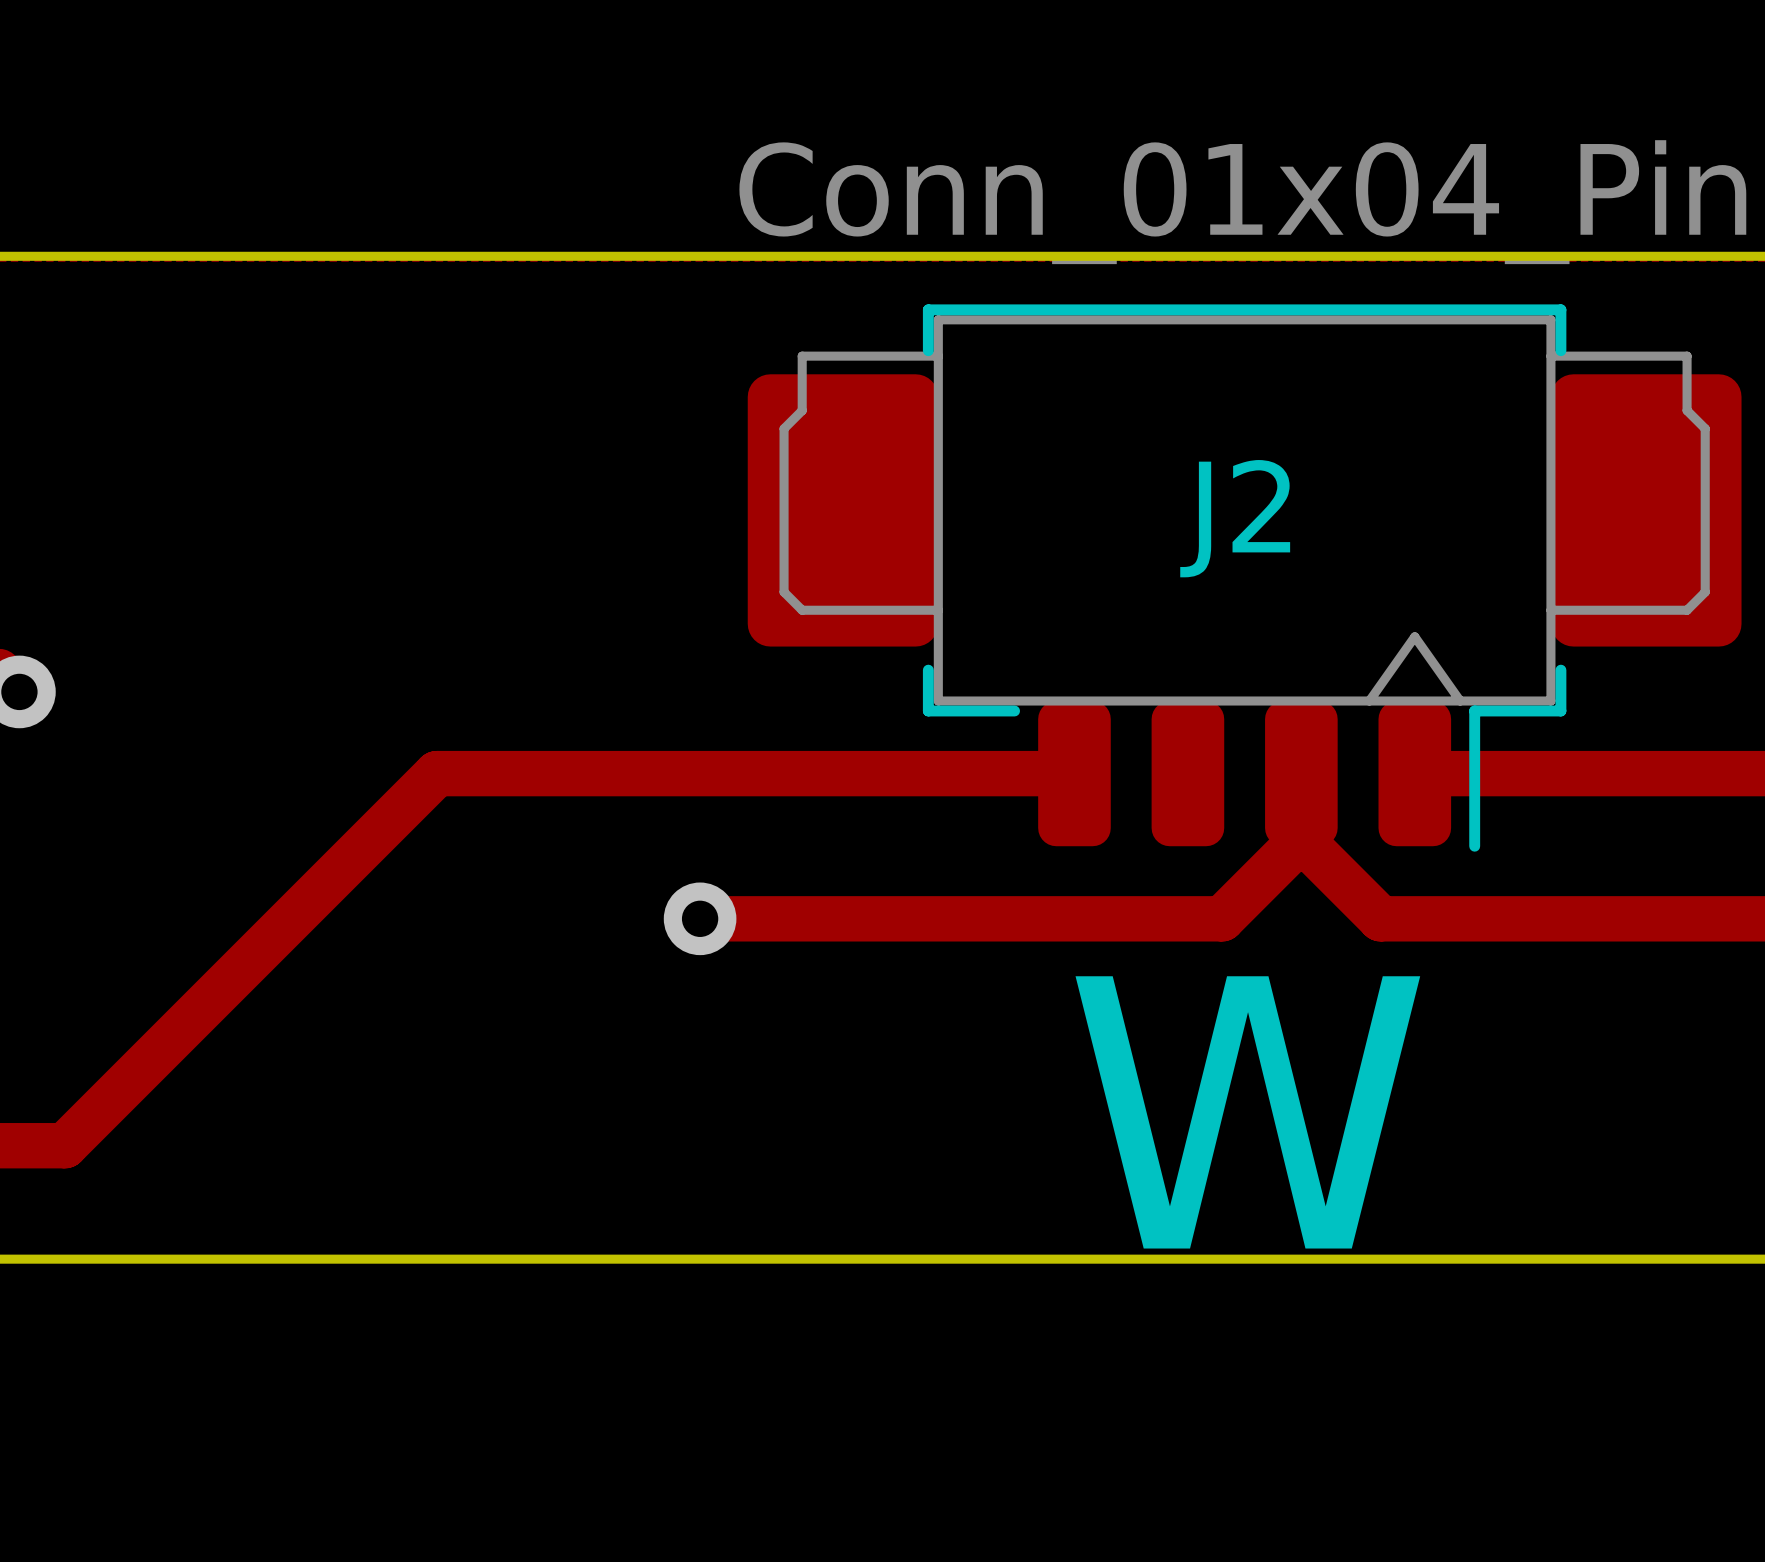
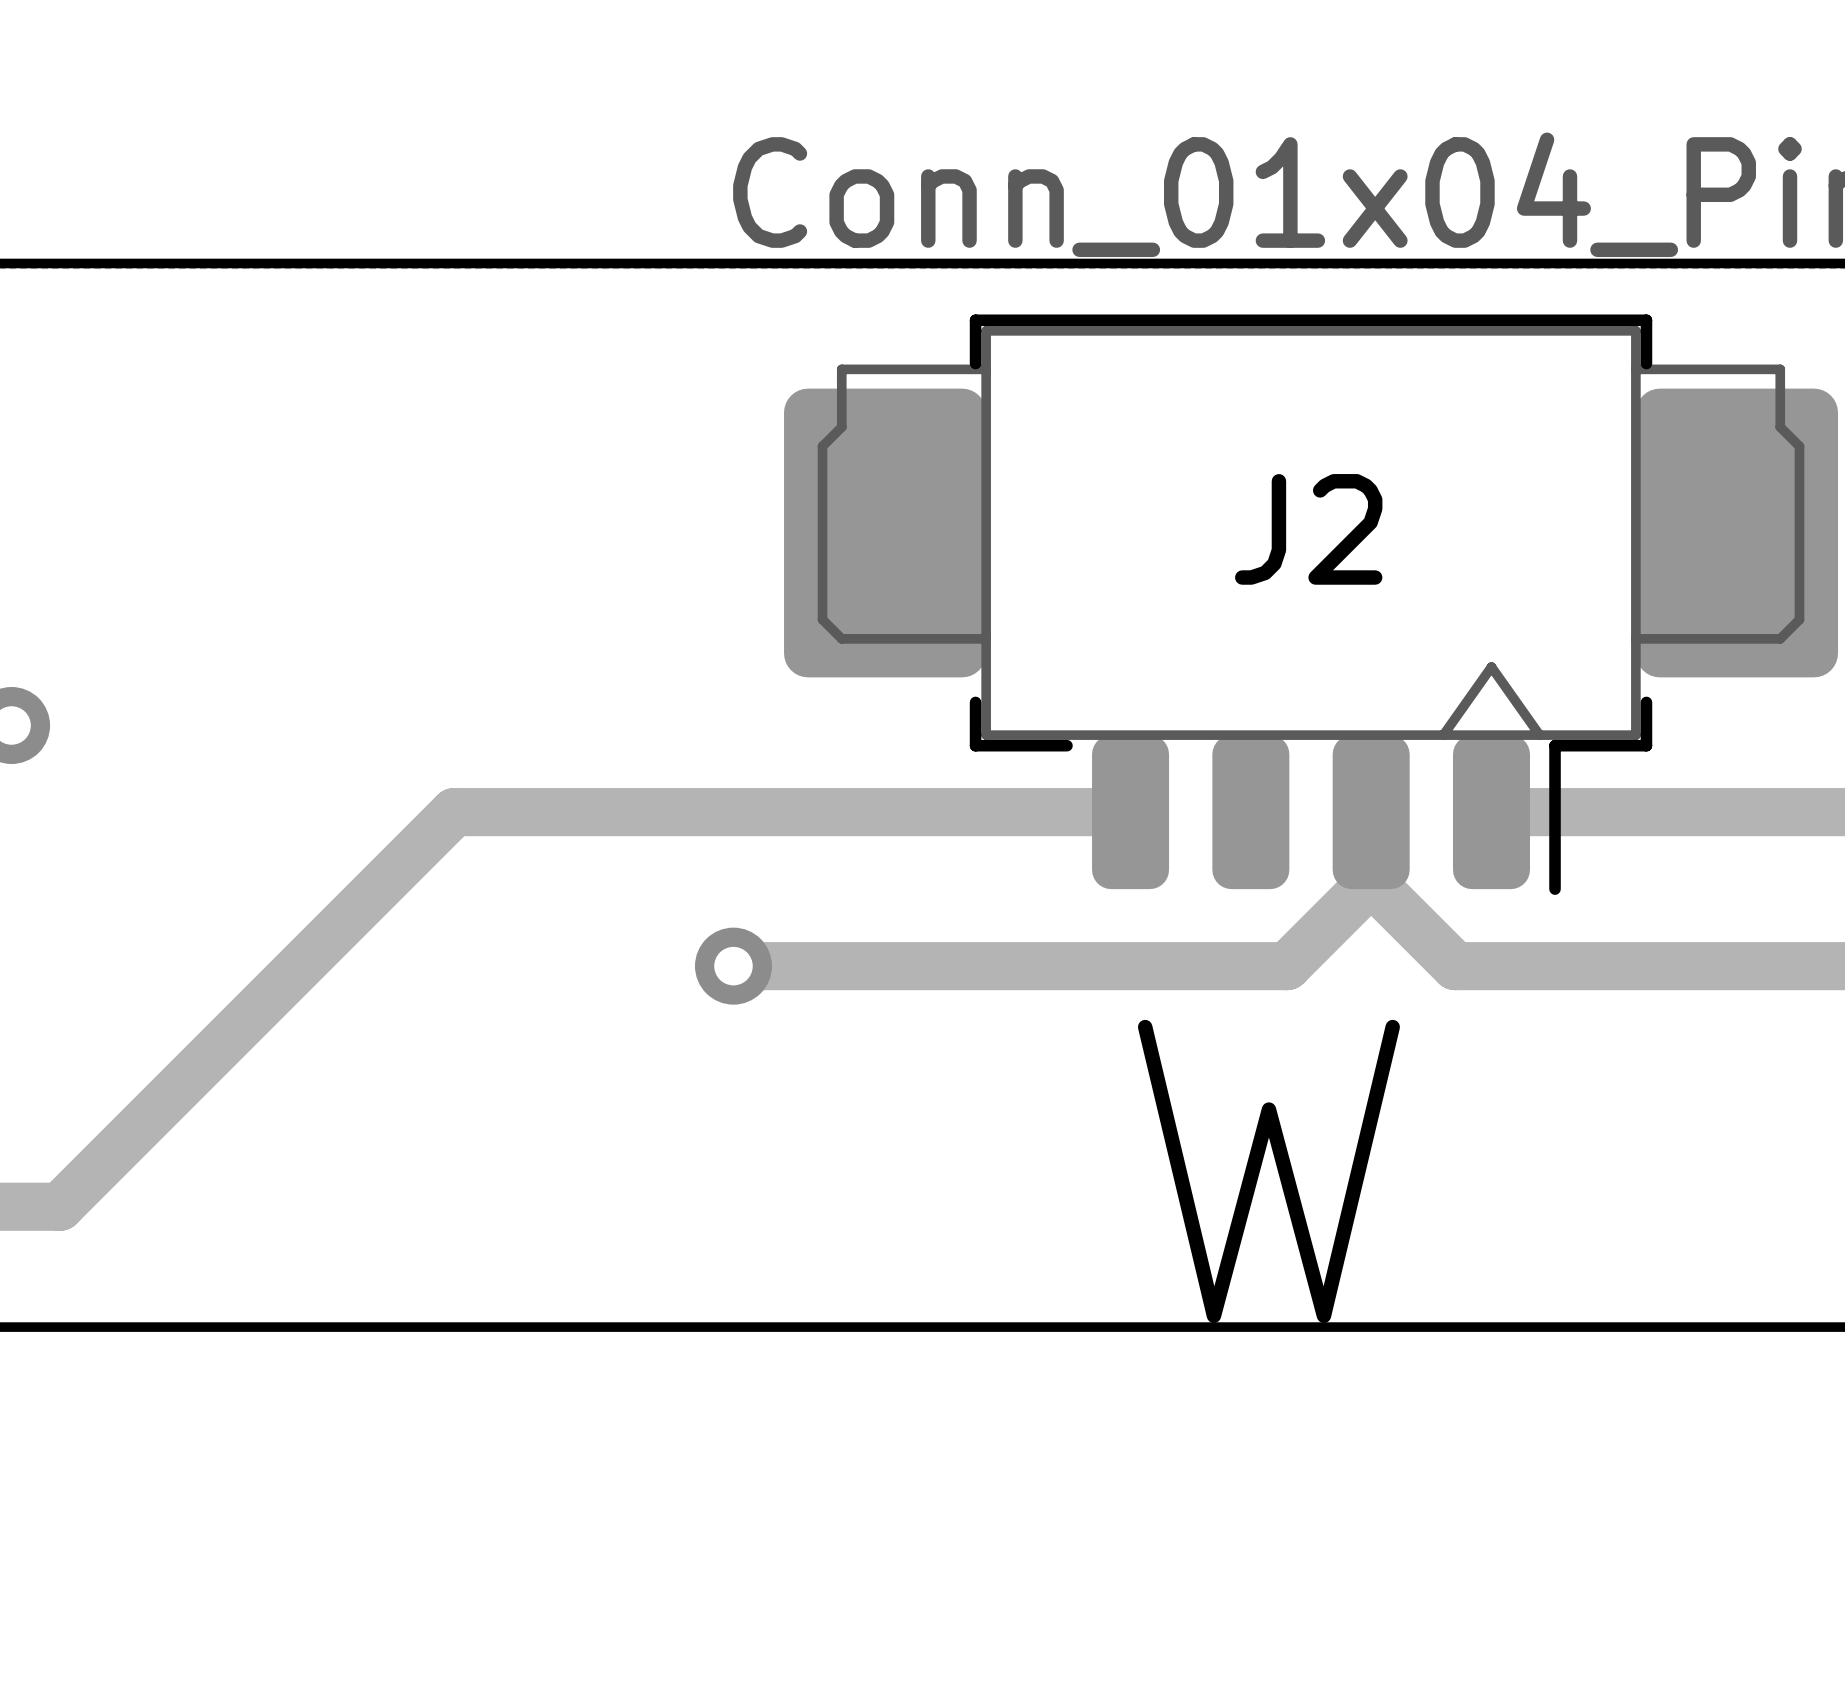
text position: W (1247, 1112) -> W (1268, 1171)

